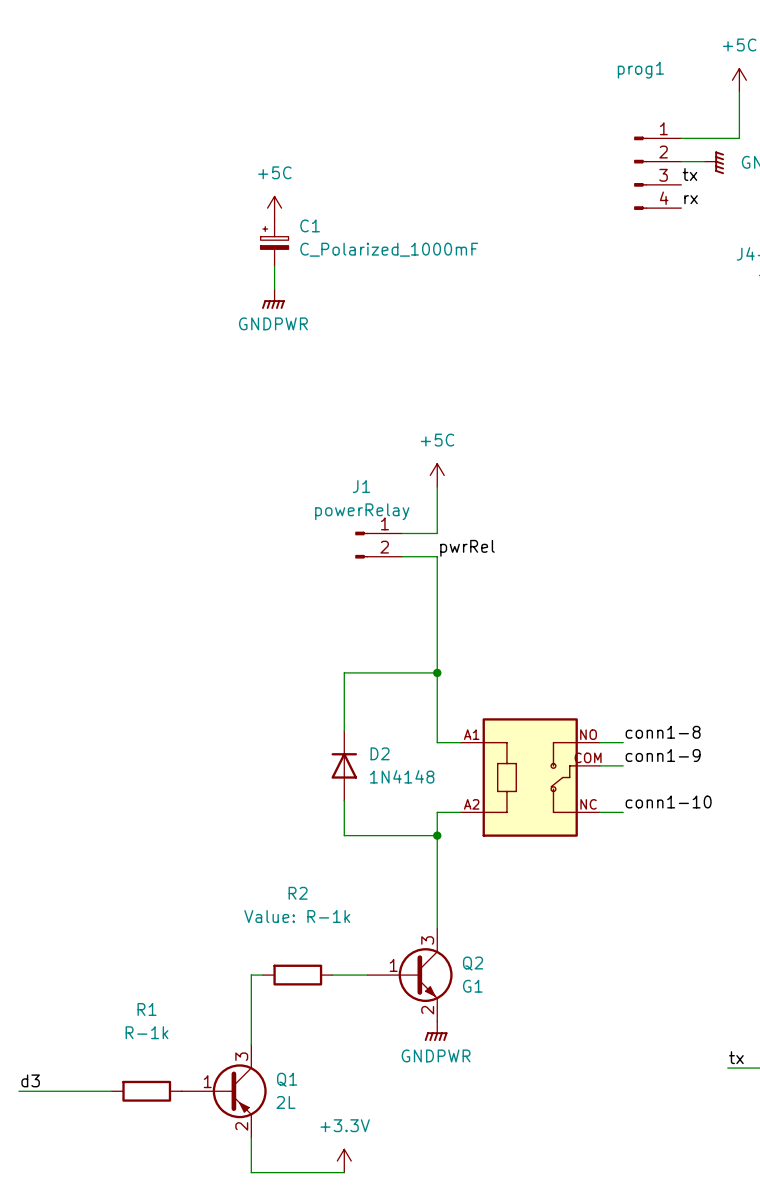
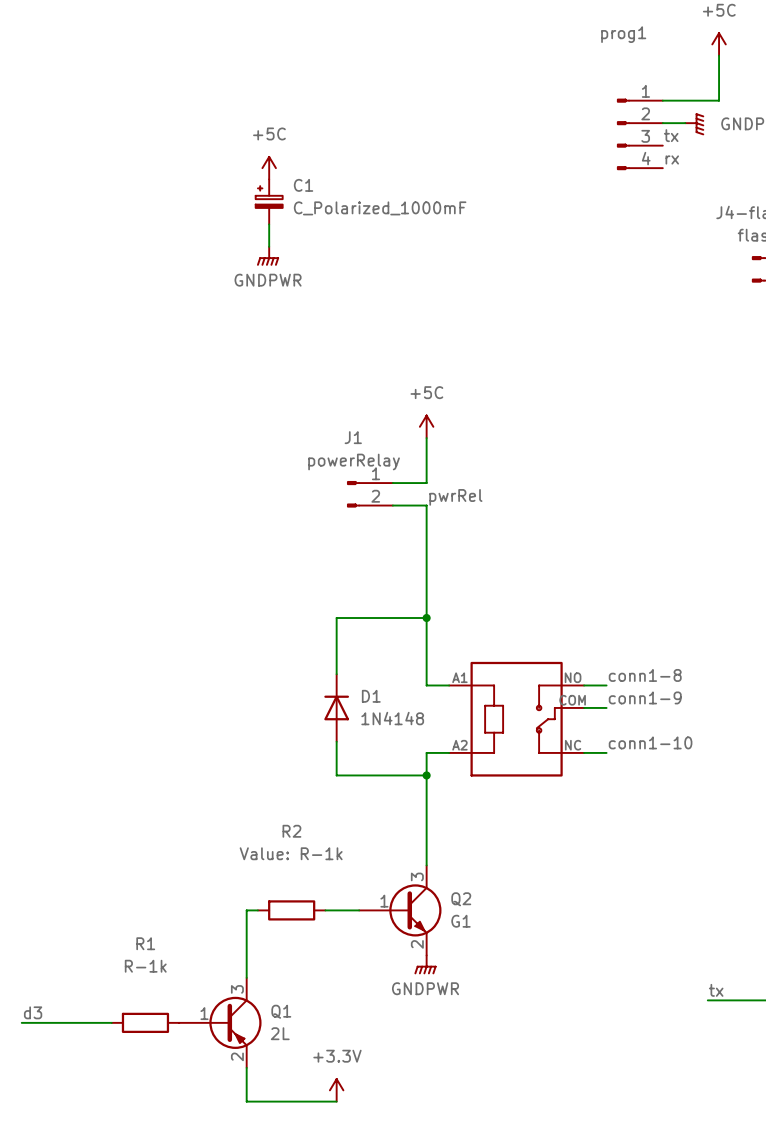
D2 name: D2 (380, 753) -> D1 (371, 696)

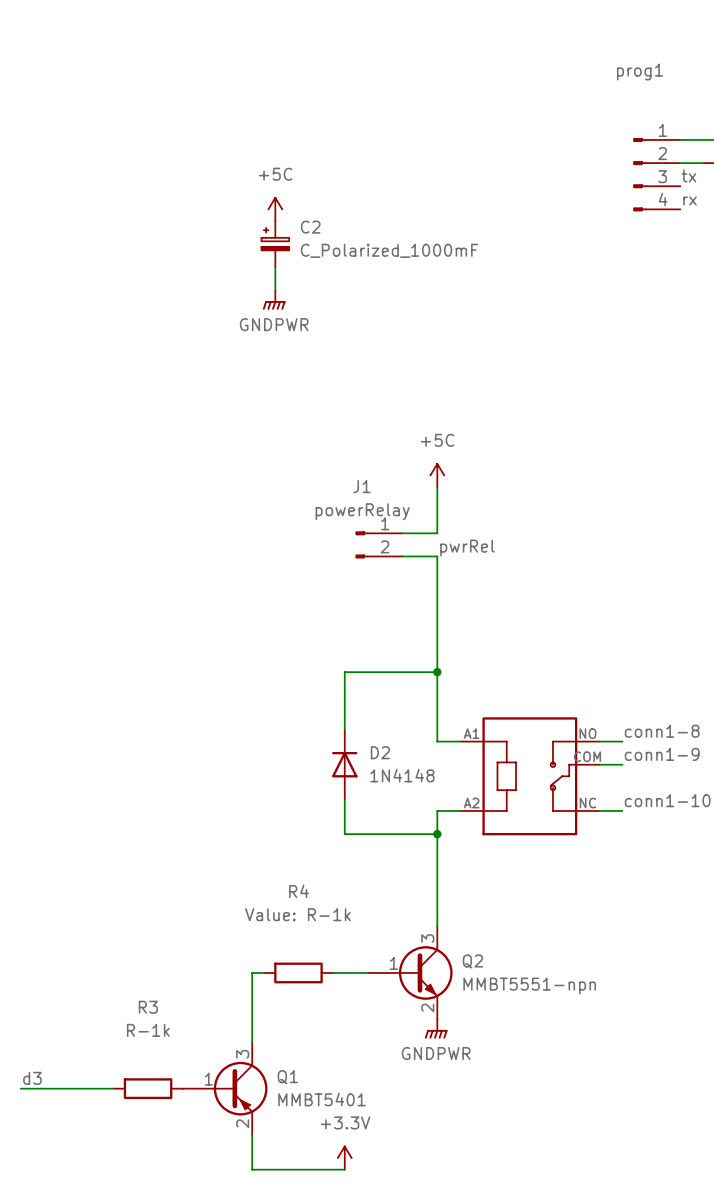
C1 name: C1 (303, 185) -> C2 (310, 227)
D1 name: D1 (371, 696) -> D2 (380, 752)
R2 name: R2 (291, 831) -> R4 (299, 891)
Q2 value: G1 (460, 921) -> MMBT5551-npn (529, 986)
R1 name: R1 (145, 943) -> R3 (148, 1007)
Q1 value: 2L (280, 1033) -> MMBT5401 (321, 1099)

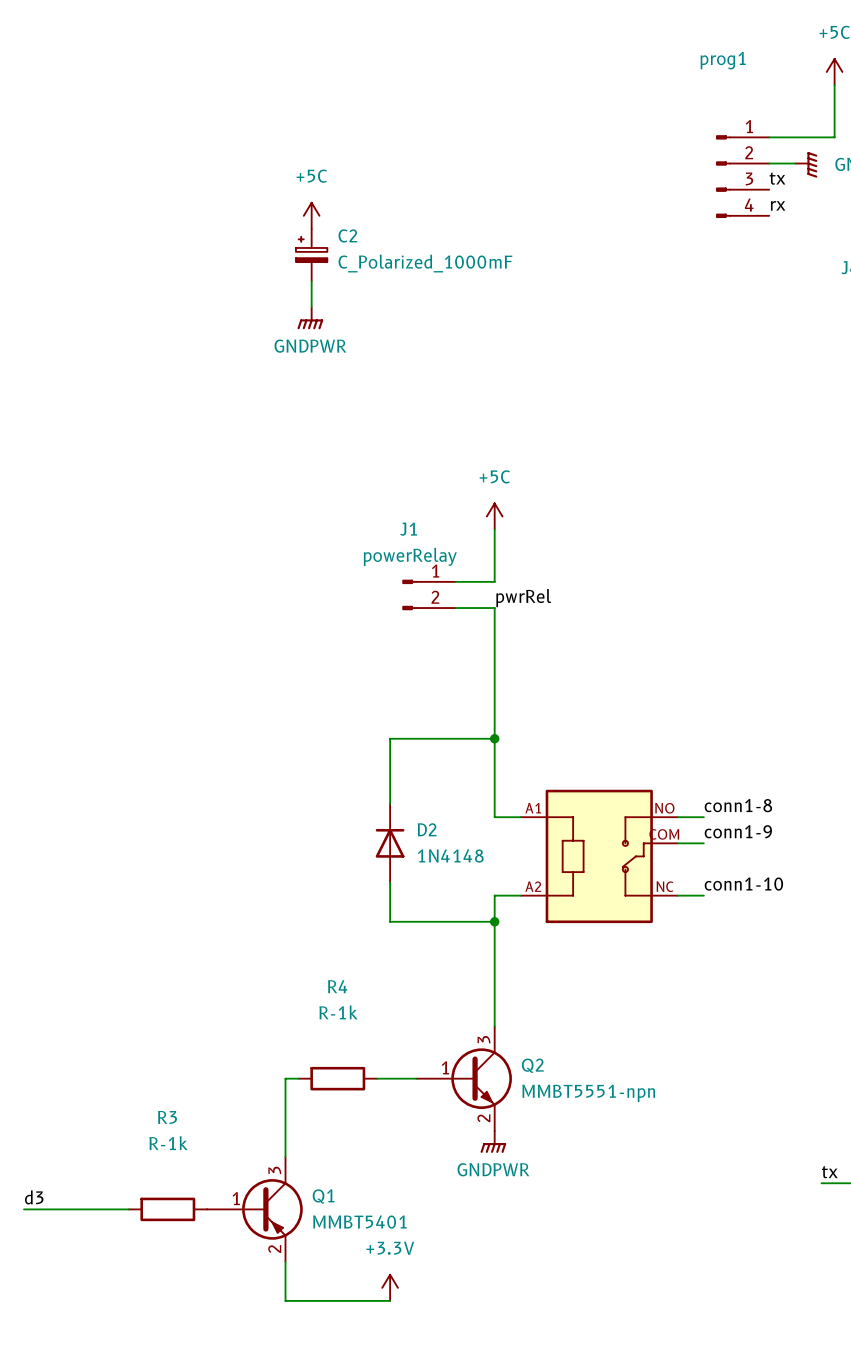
R4 value: Value: R-1k (297, 914) -> R-1k (338, 1012)

